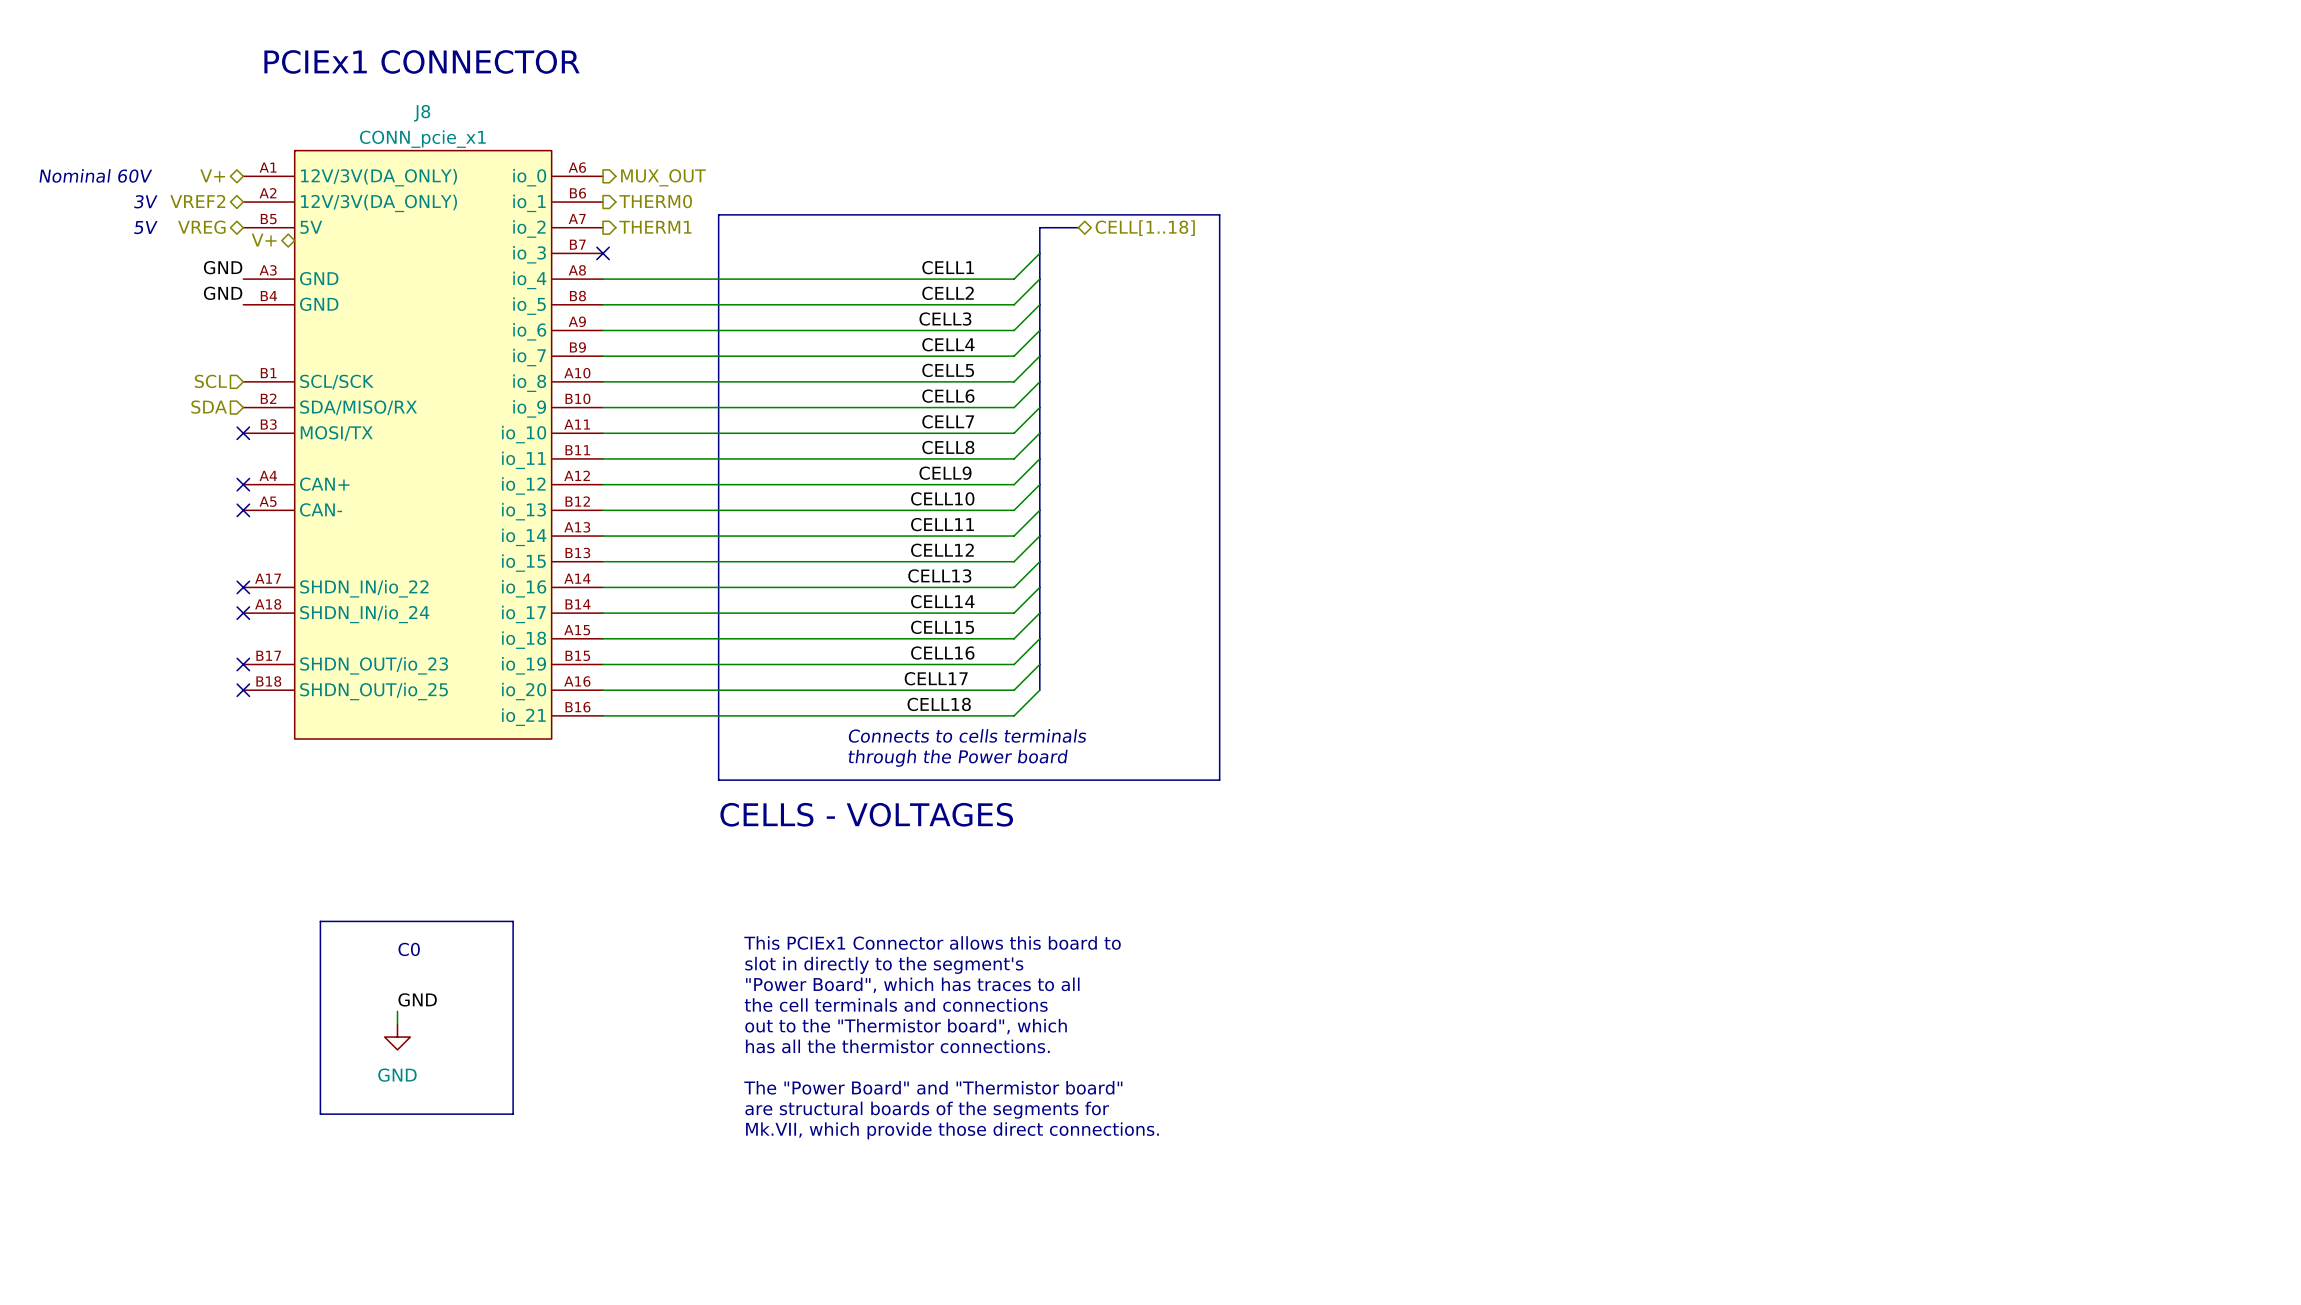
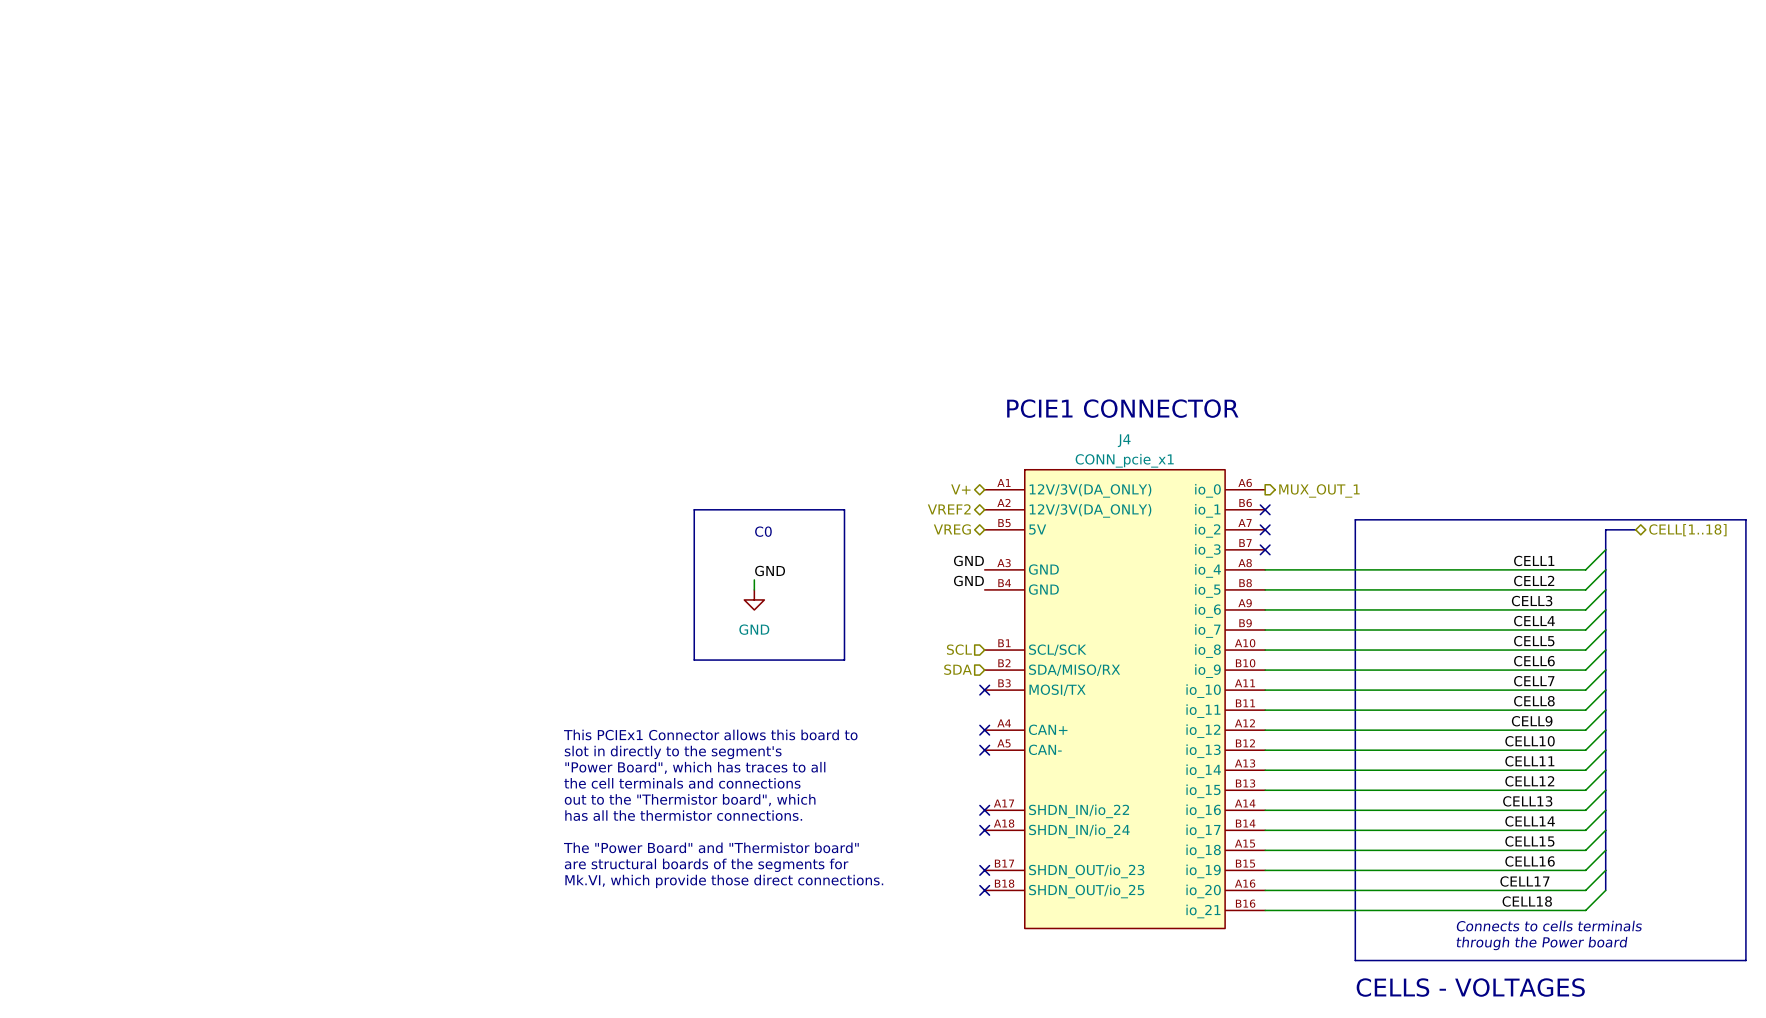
text: PCIEx1 CONNECTOR (422, 61) -> none
text: Nominal 60V (95, 175) -> none
hierarchical label: V+ (212, 175) -> none
hierarchical label: MUX_OUT (663, 177) -> none
text: 3V (145, 201) -> none
hierarchical label: VREF2 (197, 201) -> none
hierarchical label: THERM0 (655, 201) -> none
line: (718, 214) (1219, 214) (1219, 780) (718, 780) (718, 214) -> none
text: 5V (145, 227) -> none
hierarchical label: VREG (201, 227) -> none
hierarchical label: THERM1 (655, 227) -> none
bus: (1078, 227) (1039, 227) (1039, 690) -> none
hierarchical label: CELL[1..18] (1145, 228) -> none
hierarchical label: V+ (264, 240) -> none
no-connect mark: (603, 253) -> none
wire: (1039, 253) (1014, 279) (603, 279) -> none
label: GND (223, 267) -> none
label: CELL1 (948, 267) -> none
wire: (1039, 279) (1014, 304) (603, 304) -> none
label: GND (223, 293) -> none
label: CELL2 (948, 293) -> none
wire: (1039, 304) (1014, 330) (603, 330) -> none
label: CELL3 (945, 319) -> none
wire: (1039, 330) (1014, 356) (603, 356) -> none
label: CELL4 (948, 344) -> none
wire: (1039, 356) (1014, 381) (603, 381) -> none
label: CELL5 (948, 370) -> none
hierarchical label: SCL (210, 381) -> none
wire: (1039, 381) (1014, 407) (603, 407) -> none
label: CELL6 (948, 396) -> none
hierarchical label: SDA (209, 407) -> none
wire: (1039, 407) (1014, 433) (603, 433) -> none
label: CELL7 (948, 421) -> none
no-connect mark: (243, 433) -> none
wire: (1039, 433) (1014, 458) (603, 458) -> none
J8: CONN_pcie_x1 (558, 444) -> none
label: CELL8 (948, 447) -> none
wire: (1039, 458) (1014, 484) (603, 484) -> none
label: CELL9 (945, 473) -> none
no-connect mark: (243, 484) -> none
wire: (1039, 484) (1014, 510) (603, 510) -> none
label: CELL10 (942, 498) -> none
no-connect mark: (243, 510) -> none
wire: (1039, 510) (1014, 536) (603, 536) -> none
label: CELL11 (942, 524) -> none
text: none -> PCIE1 CONNECTOR (1122, 408)
wire: (1039, 536) (1014, 561) (603, 561) -> none
label: CELL12 (942, 550) -> none
wire: (1039, 561) (1014, 587) (603, 587) -> none
label: CELL13 (939, 575) -> none
no-connect mark: (243, 587) -> none
wire: (1039, 587) (1014, 613) (603, 613) -> none
label: CELL14 (942, 601) -> none
no-connect mark: (243, 613) -> none
wire: (1039, 613) (1014, 638) (603, 638) -> none
label: CELL15 (942, 627) -> none
hierarchical label: none -> V+ (960, 489)
hierarchical label: none -> MUX_OUT_1 (1319, 490)
wire: (1039, 638) (1014, 664) (603, 664) -> none
label: CELL16 (942, 653) -> none
hierarchical label: none -> VREF2 (949, 509)
line: none -> (694, 509) (844, 509) (844, 660) (694, 660) (694, 509)
no-connect mark: none -> (1265, 509)
no-connect mark: (243, 664) -> none
wire: (1039, 664) (1014, 690) (603, 690) -> none
line: none -> (1355, 519) (1355, 960) (1745, 960) (1745, 519) (1355, 519)
label: CELL17 (936, 678) -> none
hierarchical label: none -> VREG (952, 529)
no-connect mark: none -> (1265, 529)
bus: none -> (1635, 529) (1605, 529) (1605, 890)
hierarchical label: none -> CELL[1..18] (1687, 530)
text: none -> C0 (763, 531)
no-connect mark: (243, 690) -> none
wire: (1039, 690) (1014, 715) (603, 715) -> none
label: CELL18 (939, 704) -> none
no-connect mark: none -> (1265, 549)
wire: none -> (1605, 549) (1585, 569) (1265, 569)
label: none -> GND (968, 560)
label: none -> CELL1 (1534, 560)
wire: none -> (1605, 569) (1585, 589) (1265, 589)
label: none -> GND (770, 570)
text: Connects to cells terminals (967, 735) -> none
wire: none -> (754, 579) (754, 589)
label: none -> GND (968, 581)
label: none -> CELL2 (1534, 581)
wire: none -> (1605, 589) (1585, 609) (1265, 609)
text: through the Power board (958, 758) -> none
power symbol: none -> GND (754, 599)
label: none -> CELL3 (1532, 601)
wire: none -> (1605, 609) (1585, 630) (1265, 630)
label: none -> CELL4 (1534, 621)
wire: none -> (1605, 630) (1585, 650) (1265, 650)
text: CELLS - VOLTAGES (866, 814) -> none
label: none -> CELL5 (1534, 641)
hierarchical label: none -> SCL (959, 649)
wire: none -> (1605, 650) (1585, 670) (1265, 670)
label: none -> CELL6 (1534, 661)
hierarchical label: none -> SDA (958, 669)
wire: none -> (1605, 670) (1585, 690) (1265, 690)
label: none -> CELL7 (1534, 681)
no-connect mark: none -> (984, 690)
wire: none -> (1605, 690) (1585, 710) (1265, 710)
J4: none -> CONN_pcie_x1 (1230, 699)
label: none -> CELL8 (1534, 701)
wire: none -> (1605, 710) (1585, 730) (1265, 730)
line: (320, 921) (320, 1114) (513, 1114) (513, 921) (320, 921) -> none
label: none -> CELL9 (1532, 721)
no-connect mark: none -> (984, 730)
wire: none -> (1605, 730) (1585, 750) (1265, 750)
text: C0 (409, 949) -> none
label: none -> CELL10 (1530, 741)
no-connect mark: none -> (984, 750)
wire: none -> (1605, 750) (1585, 770) (1265, 770)
label: none -> CELL11 (1529, 761)
wire: none -> (1605, 770) (1585, 790) (1265, 790)
label: GND (417, 999) -> none
label: none -> CELL12 (1529, 781)
wire: (397, 1011) (397, 1024) -> none
wire: none -> (1605, 790) (1585, 810) (1265, 810)
label: none -> CELL13 (1527, 801)
power symbol: GND (397, 1037) -> none
no-connect mark: none -> (984, 810)
wire: none -> (1605, 810) (1585, 830) (1265, 830)
label: none -> CELL14 (1530, 821)
no-connect mark: none -> (984, 830)
wire: none -> (1605, 830) (1585, 850) (1265, 850)
label: none -> CELL15 (1529, 841)
wire: none -> (1605, 850) (1585, 870) (1265, 870)
label: none -> CELL16 (1530, 861)
no-connect mark: none -> (984, 870)
wire: none -> (1605, 870) (1585, 890) (1265, 890)
text: Mk.VII, which provide those direct connections. (952, 1130) -> Mk.VI, which provide those direct connections. (724, 881)
label: none -> CELL17 (1524, 881)
no-connect mark: none -> (984, 890)
wire: none -> (1605, 890) (1585, 910) (1265, 910)
label: none -> CELL18 (1527, 901)
text: none -> Connects to cells terminals (1549, 926)
text: none -> through the Power board (1542, 943)
text: none -> CELLS - VOLTAGES (1470, 987)

